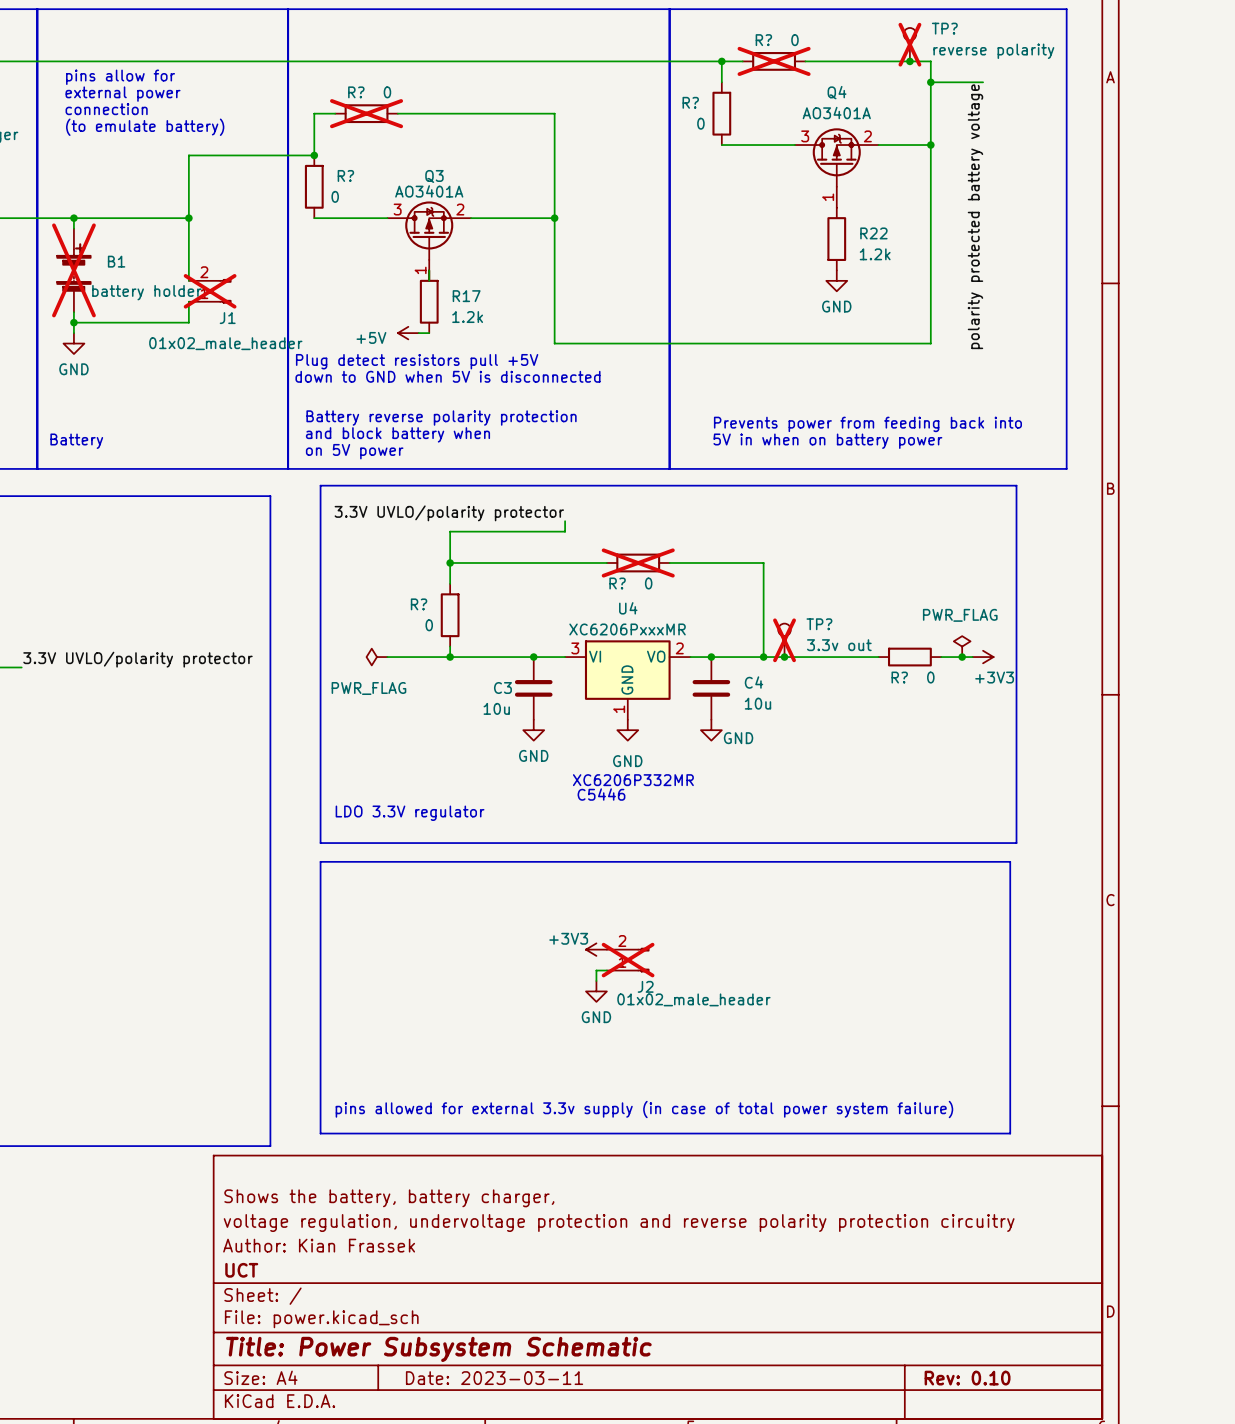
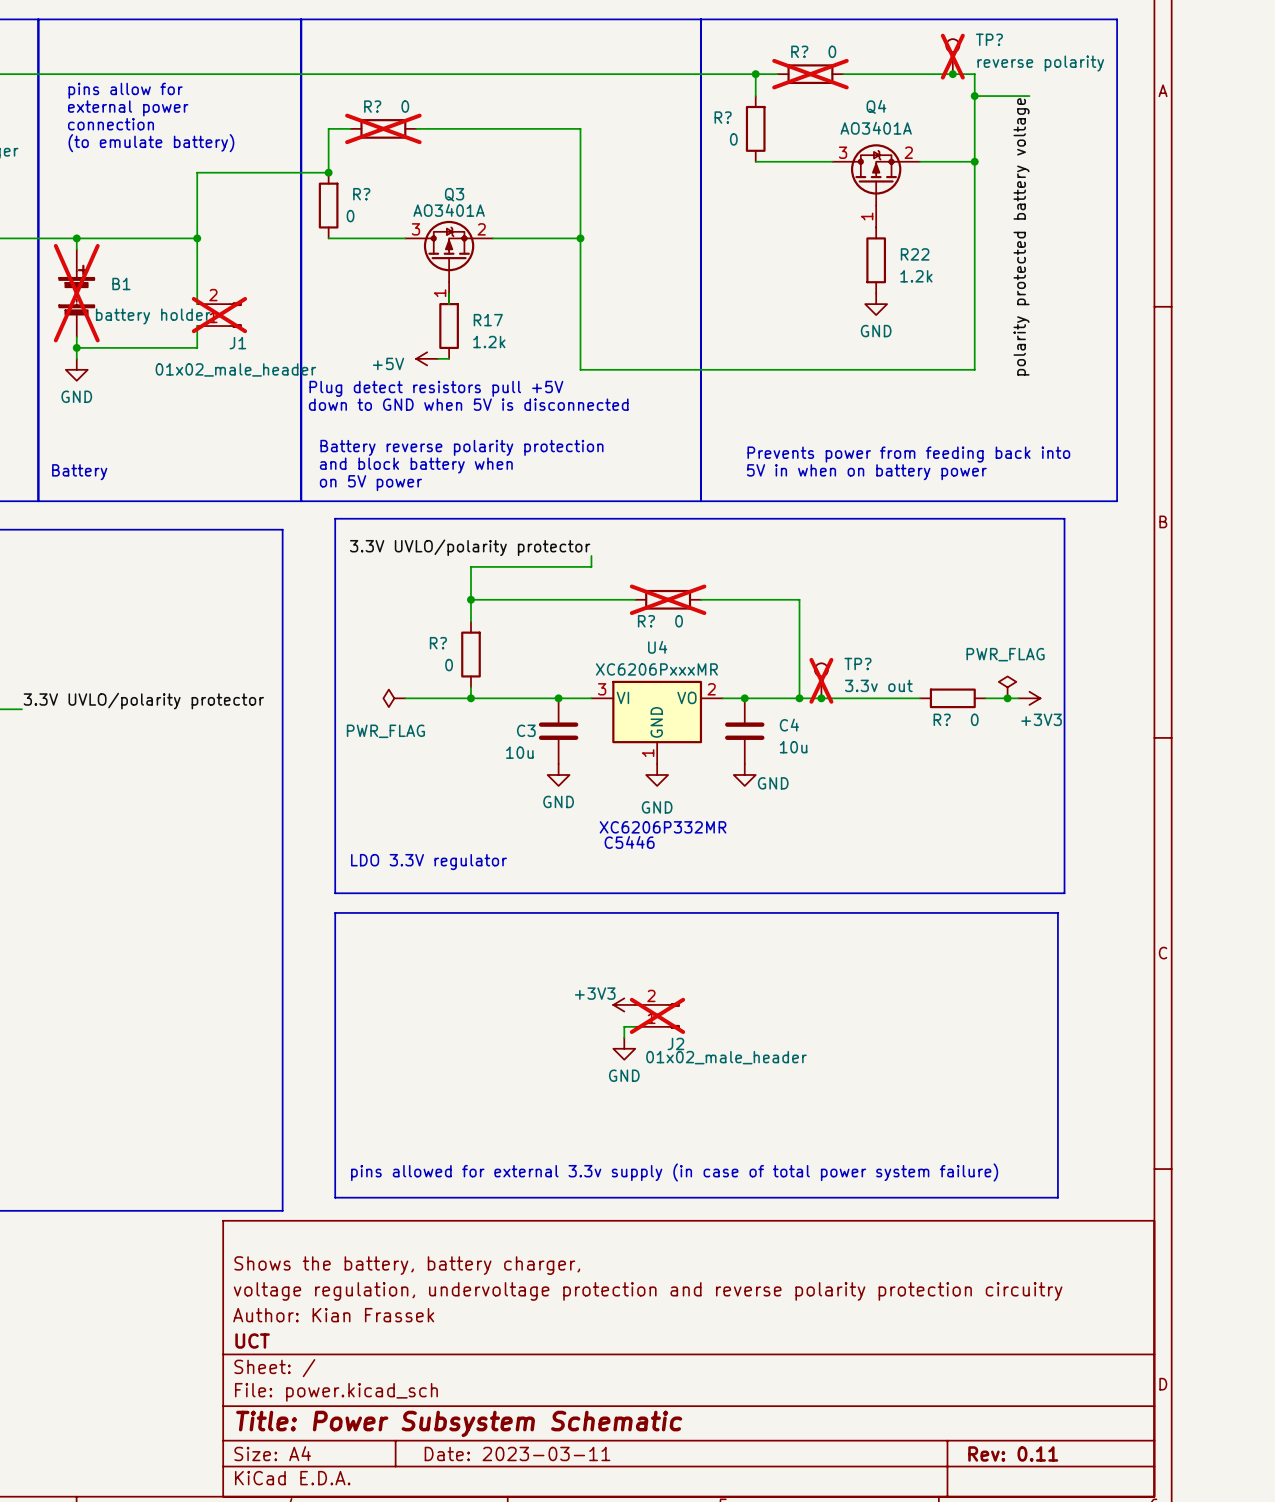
title block: Rev: 0.10 (967, 1378) -> Rev: 0.11 (1013, 1453)

